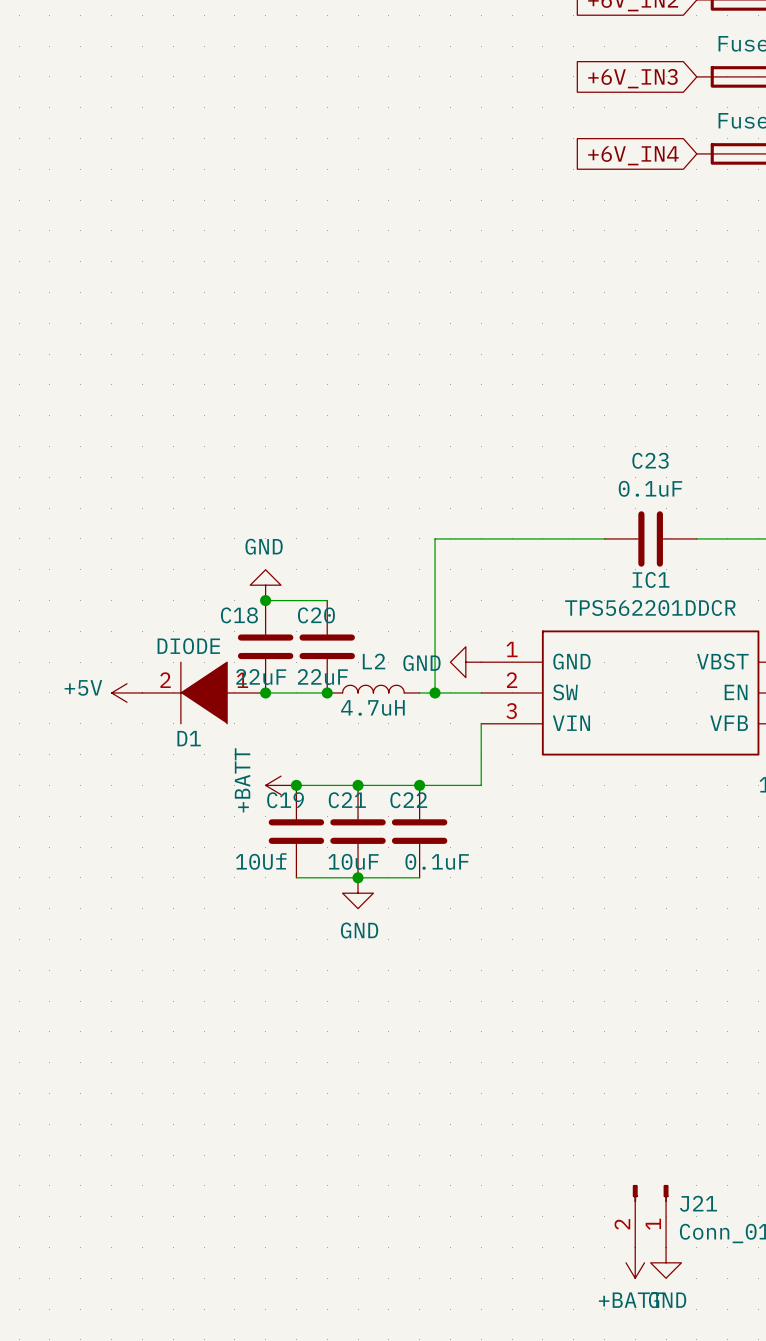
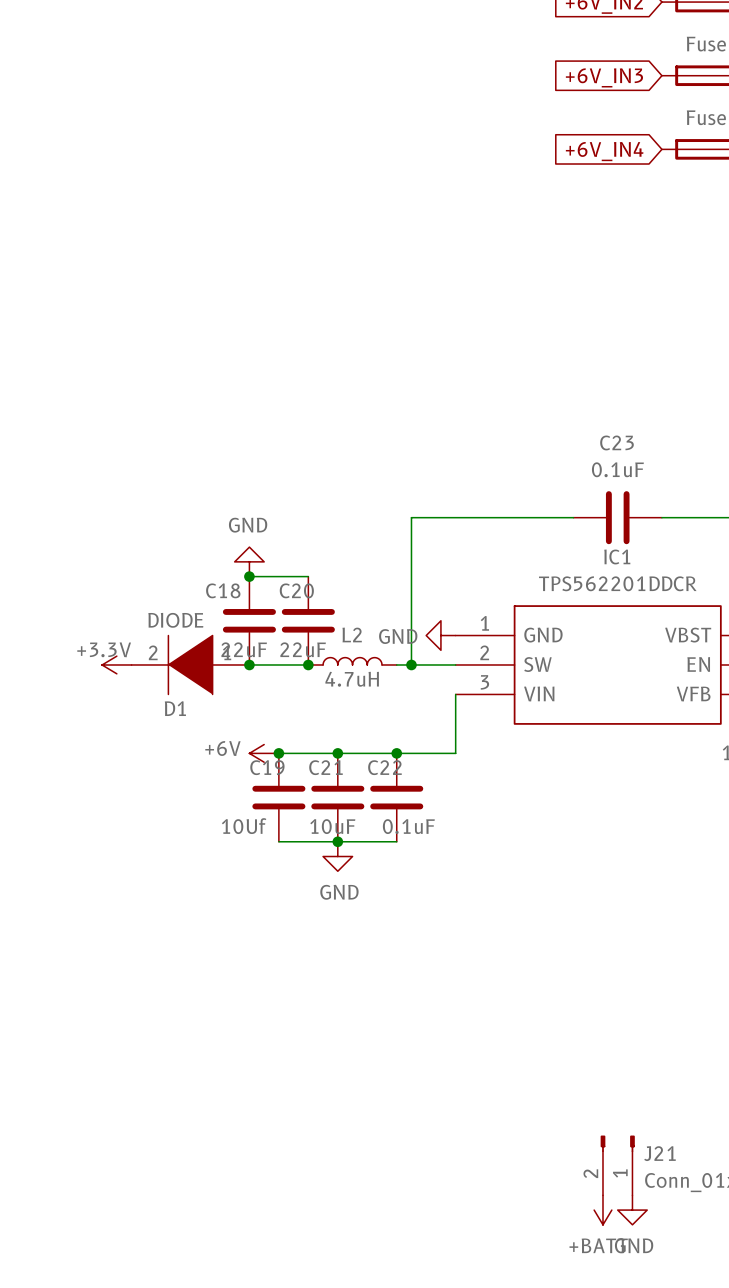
power symbol: +5V (126, 692) -> +3.3V (116, 664)
power symbol: +BATT (281, 785) -> +6V (264, 753)

